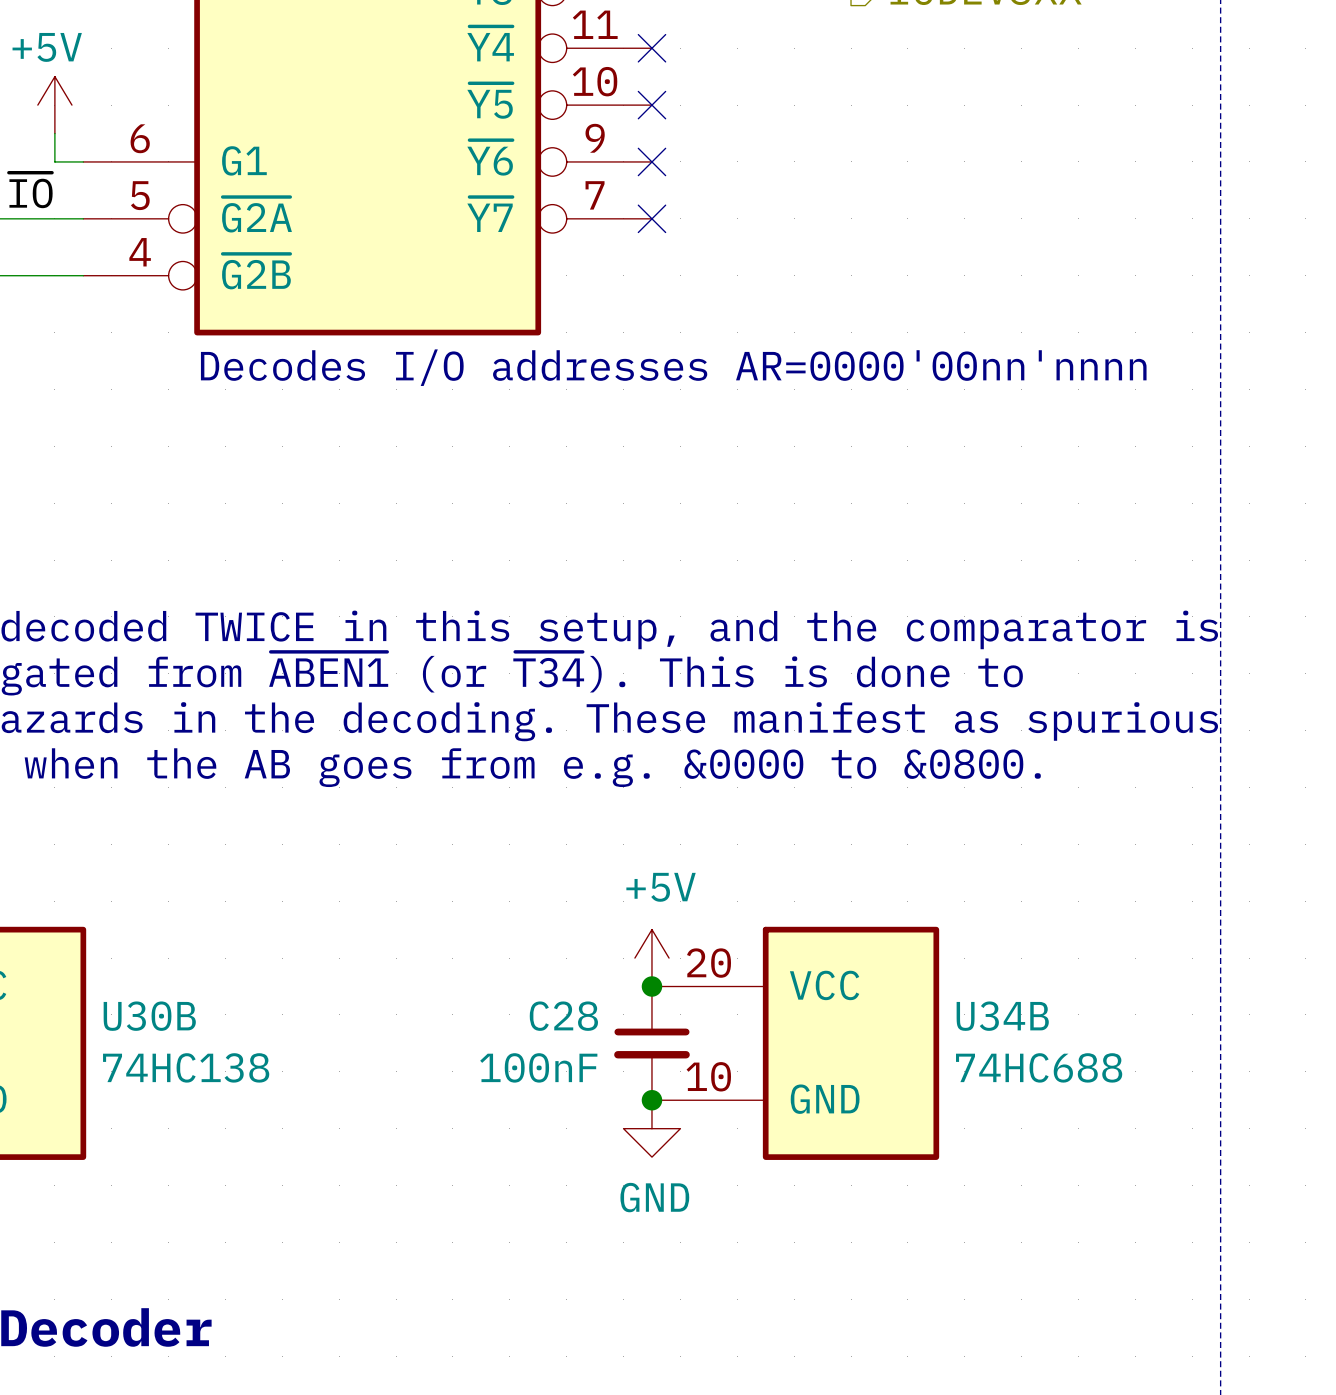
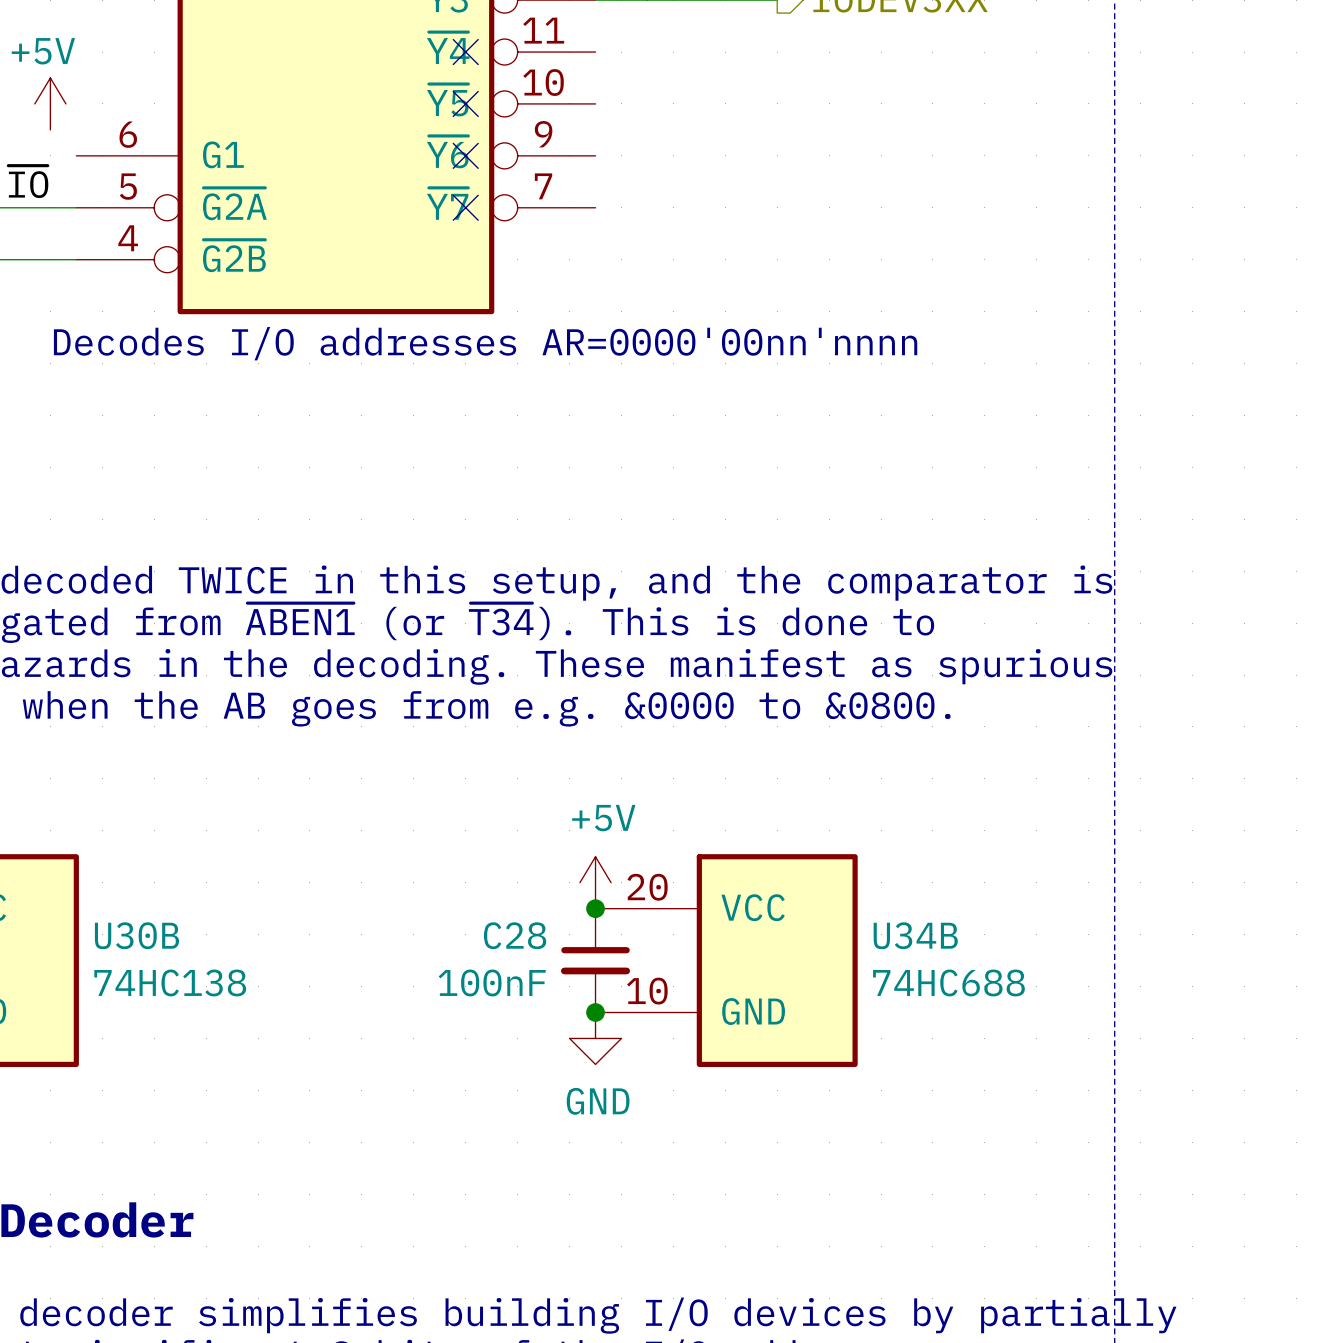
no-connect mark: none -> (465, 52)
no-connect mark: (651, 48) -> none
no-connect mark: none -> (465, 103)
no-connect mark: (651, 105) -> none
wire: (54, 133) (54, 161) (83, 161) -> none
no-connect mark: none -> (465, 155)
no-connect mark: (651, 161) -> none
no-connect mark: none -> (465, 207)
no-connect mark: (651, 218) -> none
text position: Decodes I/O addresses AR=0000'00nn'nnnn (673, 367) -> Decodes I/O addresses AR=0000'00nn'nnnn (485, 343)

